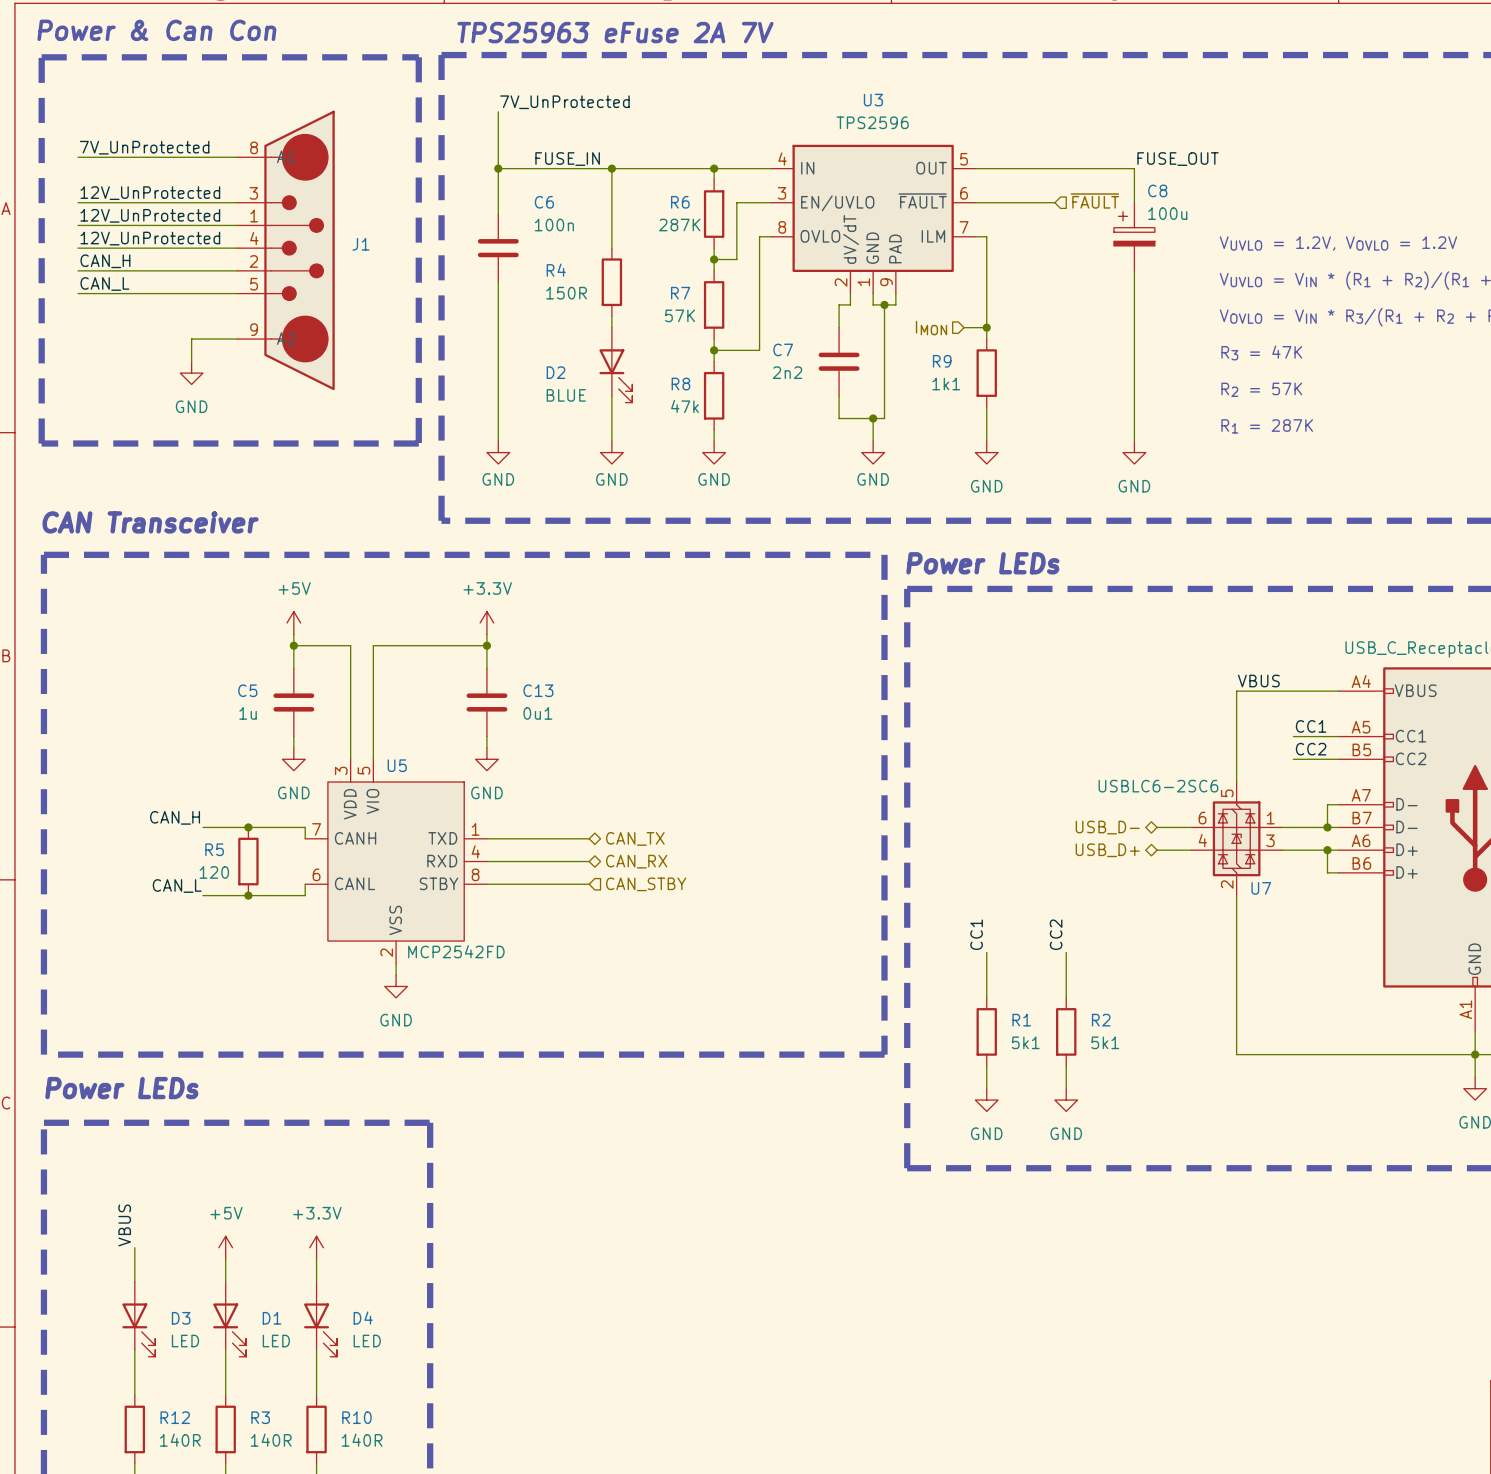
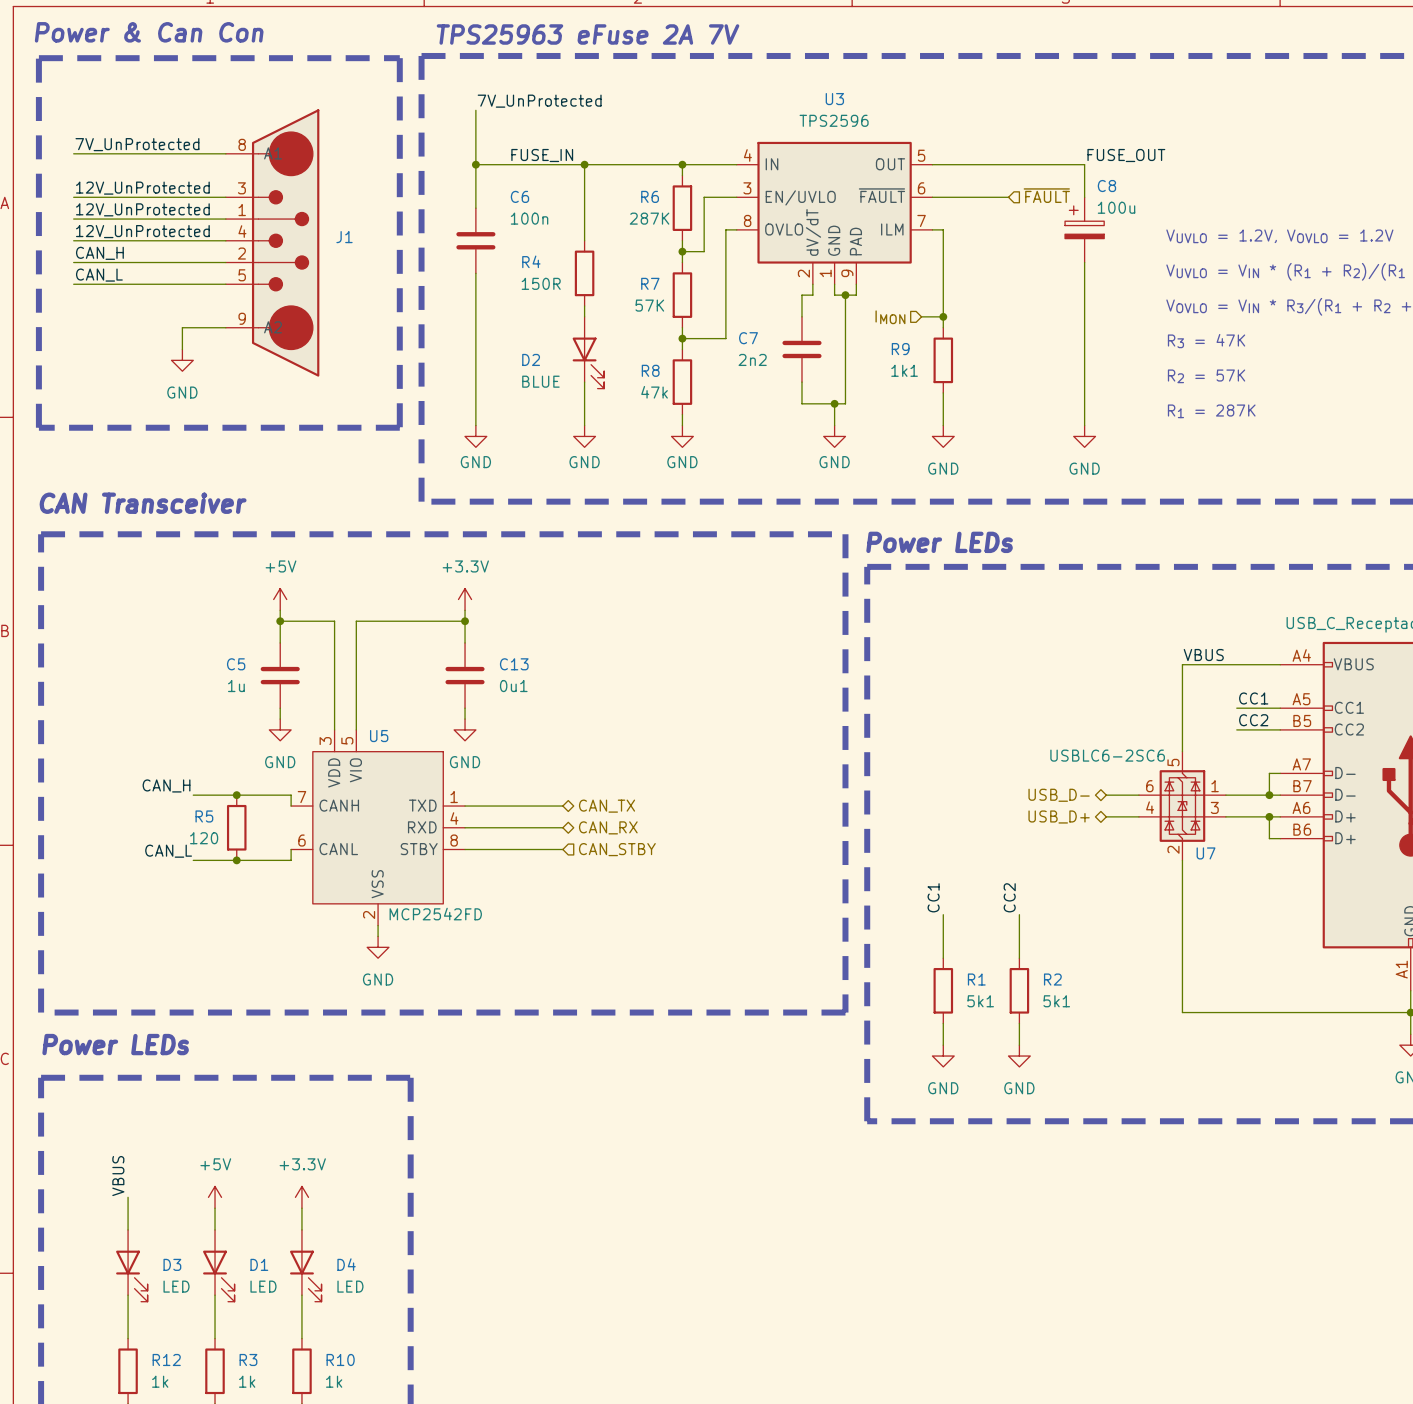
R12 value: 140R (180, 1440) -> 1k (160, 1381)
R3 value: 140R (271, 1440) -> 1k (247, 1381)
R10 value: 140R (362, 1440) -> 1k (334, 1381)

